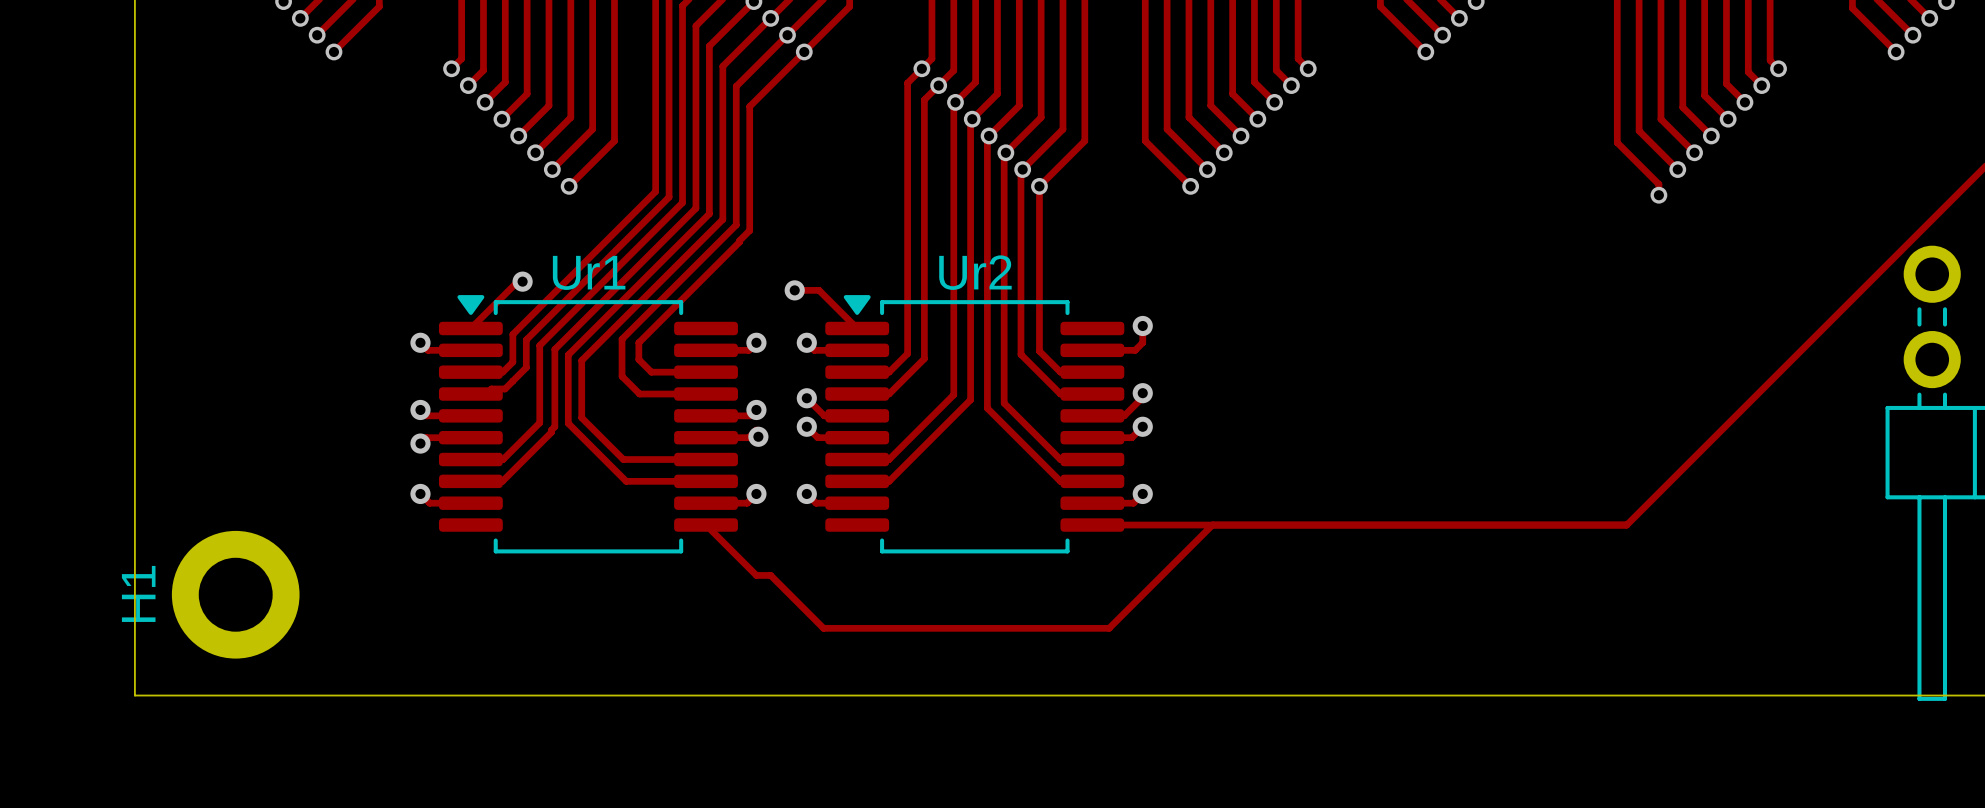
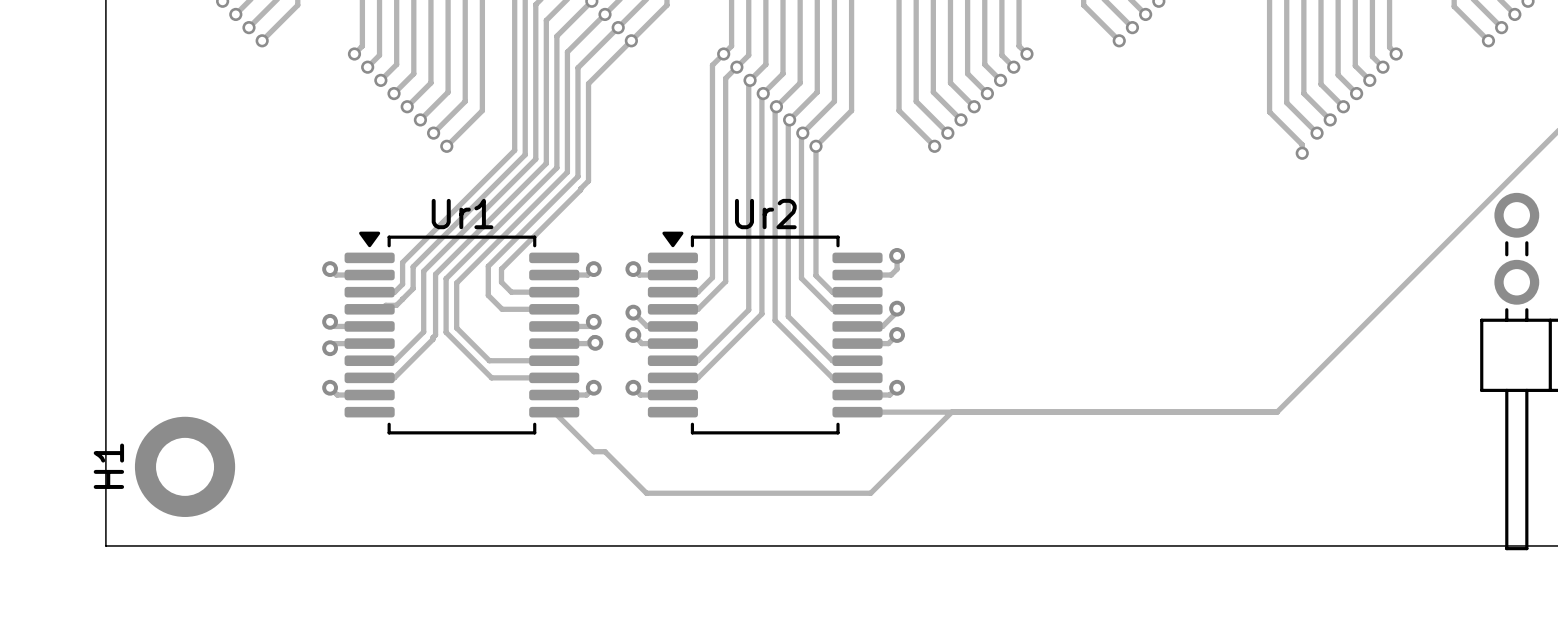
track: (522, 281) (517, 281) (470, 328) -> none
via: (522, 281) -> none
track: (794, 290) (819, 290) (857, 328) -> none
via: (794, 290) -> none

